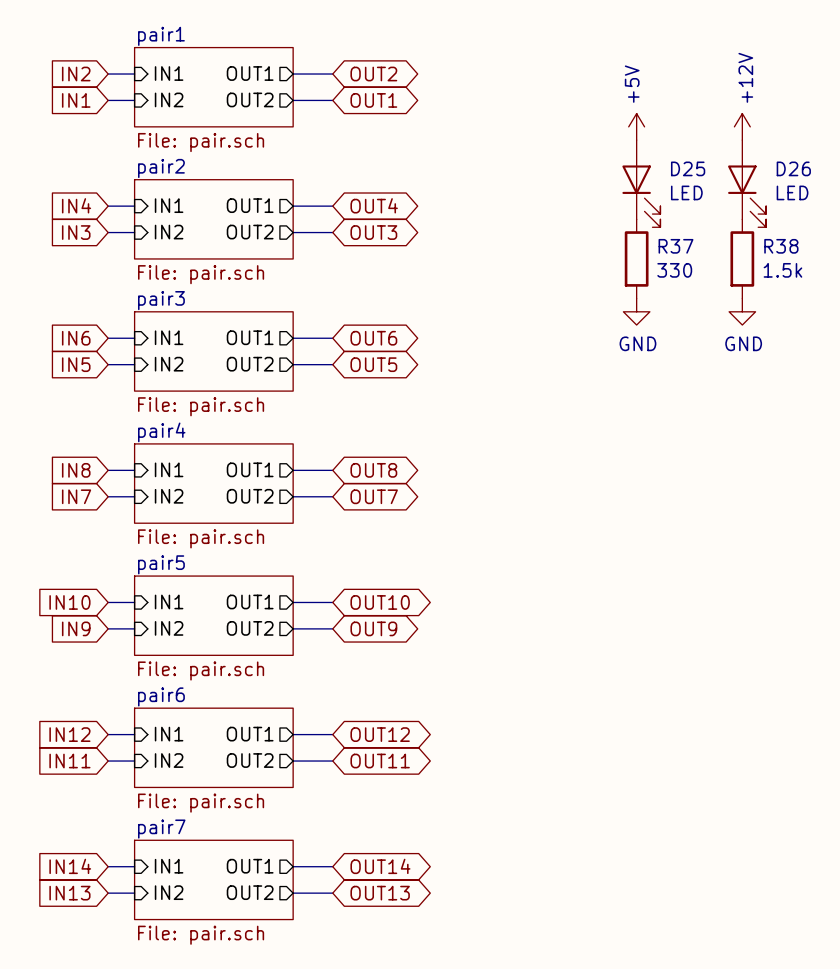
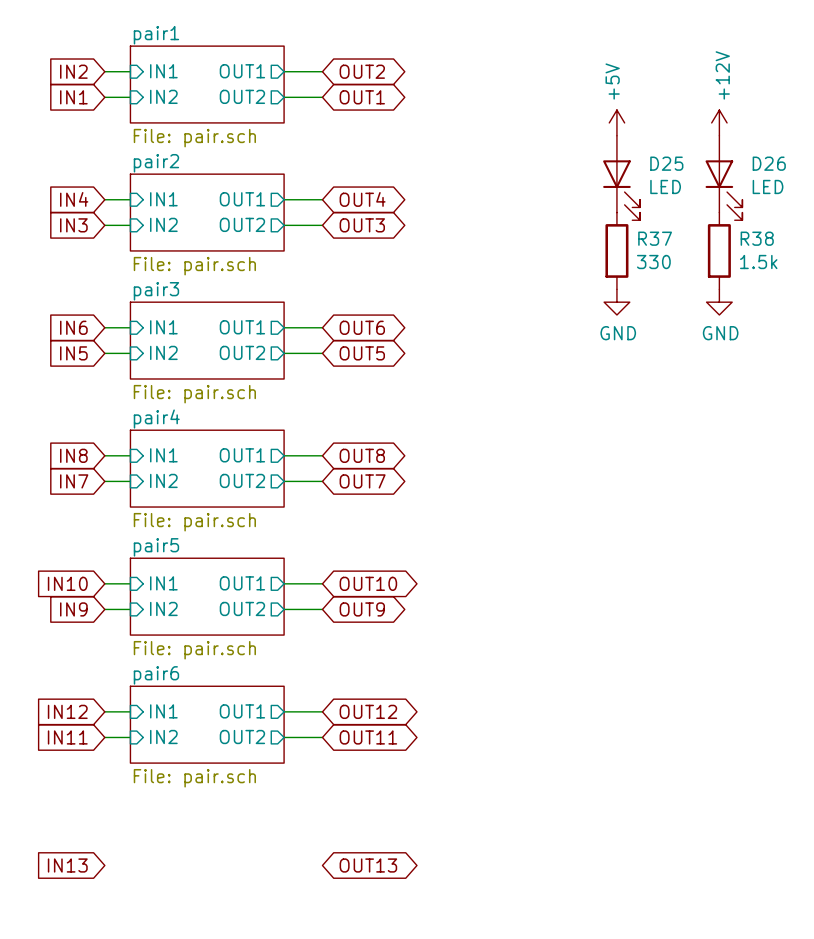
global label: IN14 (70, 866) -> none
wire: (108, 866) (134, 866) -> none
sheet pin: IN1 (169, 866) -> none
sheet pin: OUT1 (250, 866) -> none
wire: (293, 866) (332, 866) -> none
global label: OUT14 (380, 866) -> none
sheet pair7: File: pair.sch (213, 879) -> none
sheet pin: IN2 (169, 892) -> none
sheet pin: OUT2 (250, 892) -> none
wire: (108, 893) (134, 893) -> none
wire: (293, 893) (332, 893) -> none

